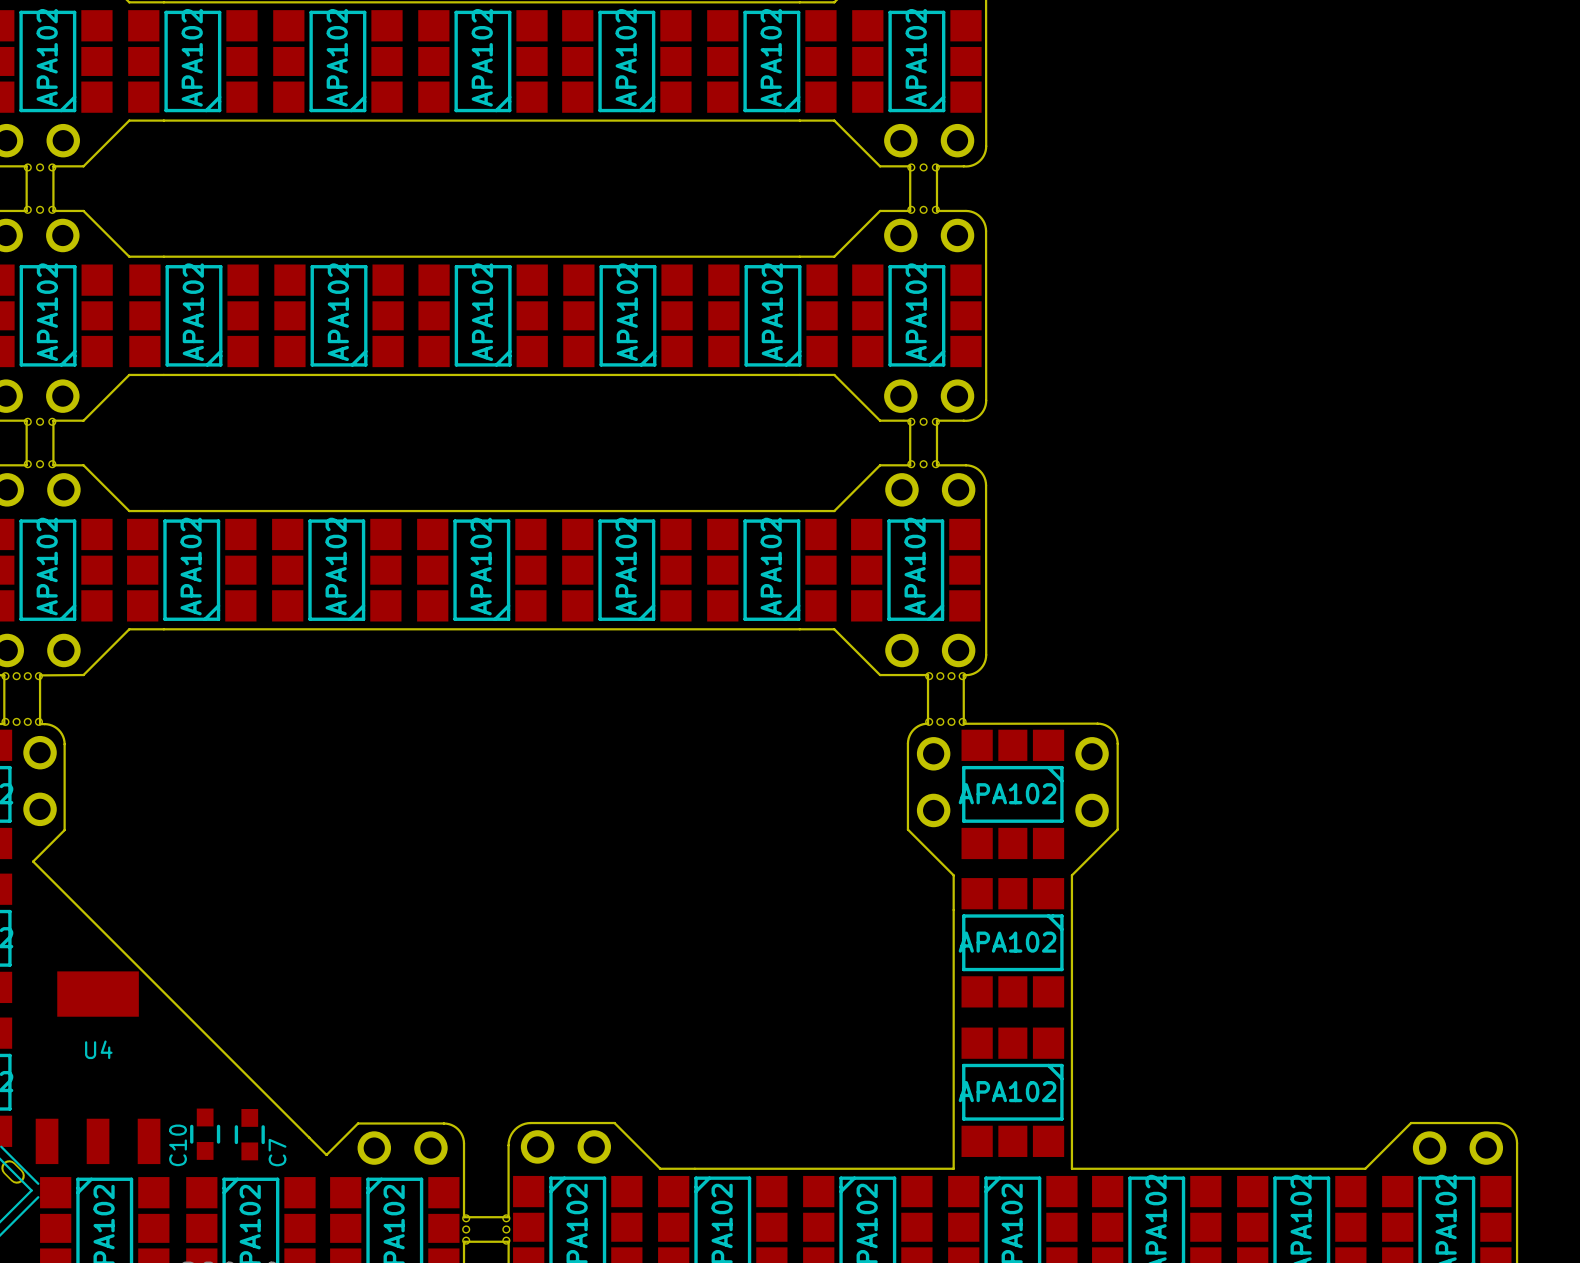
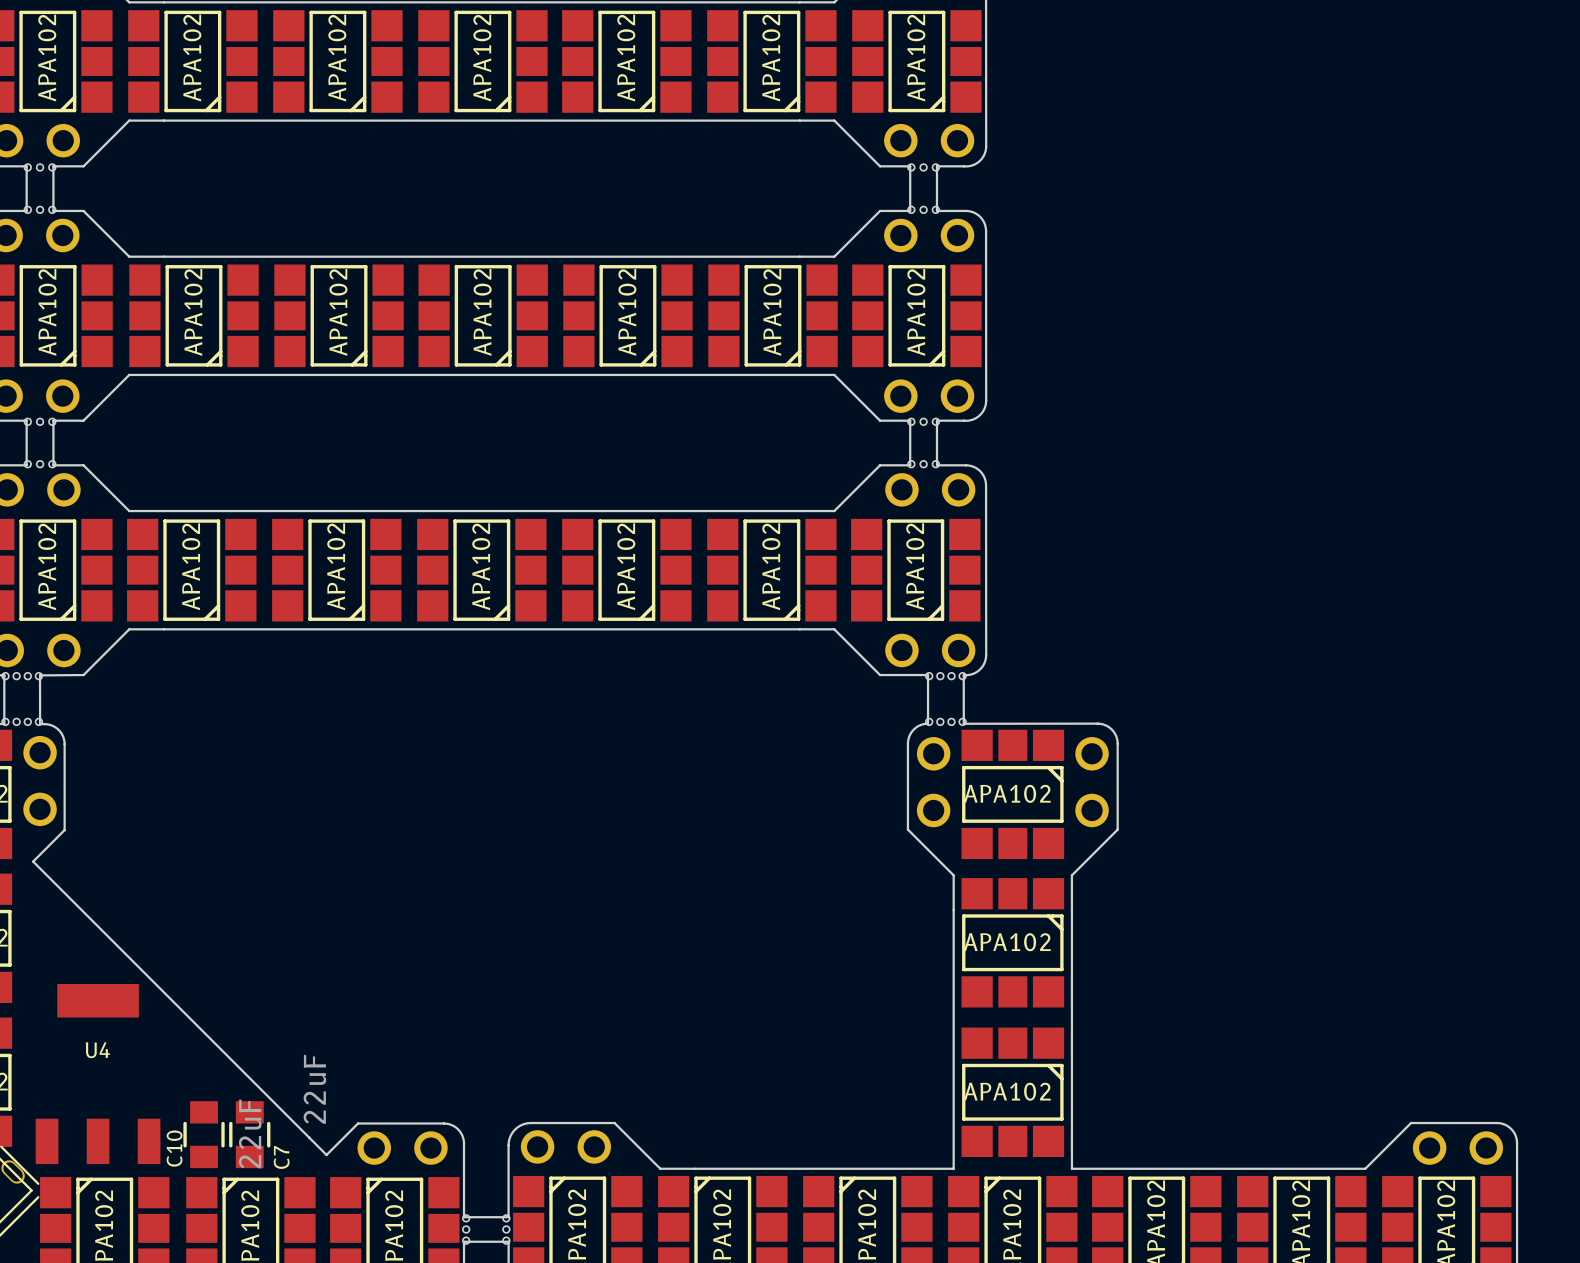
U4 footprint: [35, 971, 161, 1165] -> [35, 984, 161, 1165]
part: none -> 22uF (204, 1134)
C10: (205, 1134) -> none
C7: (249, 1134) -> none
part: none -> 22uF (249, 1134)
text: none -> C10 (174, 1148)
text: none -> C7 (281, 1157)

